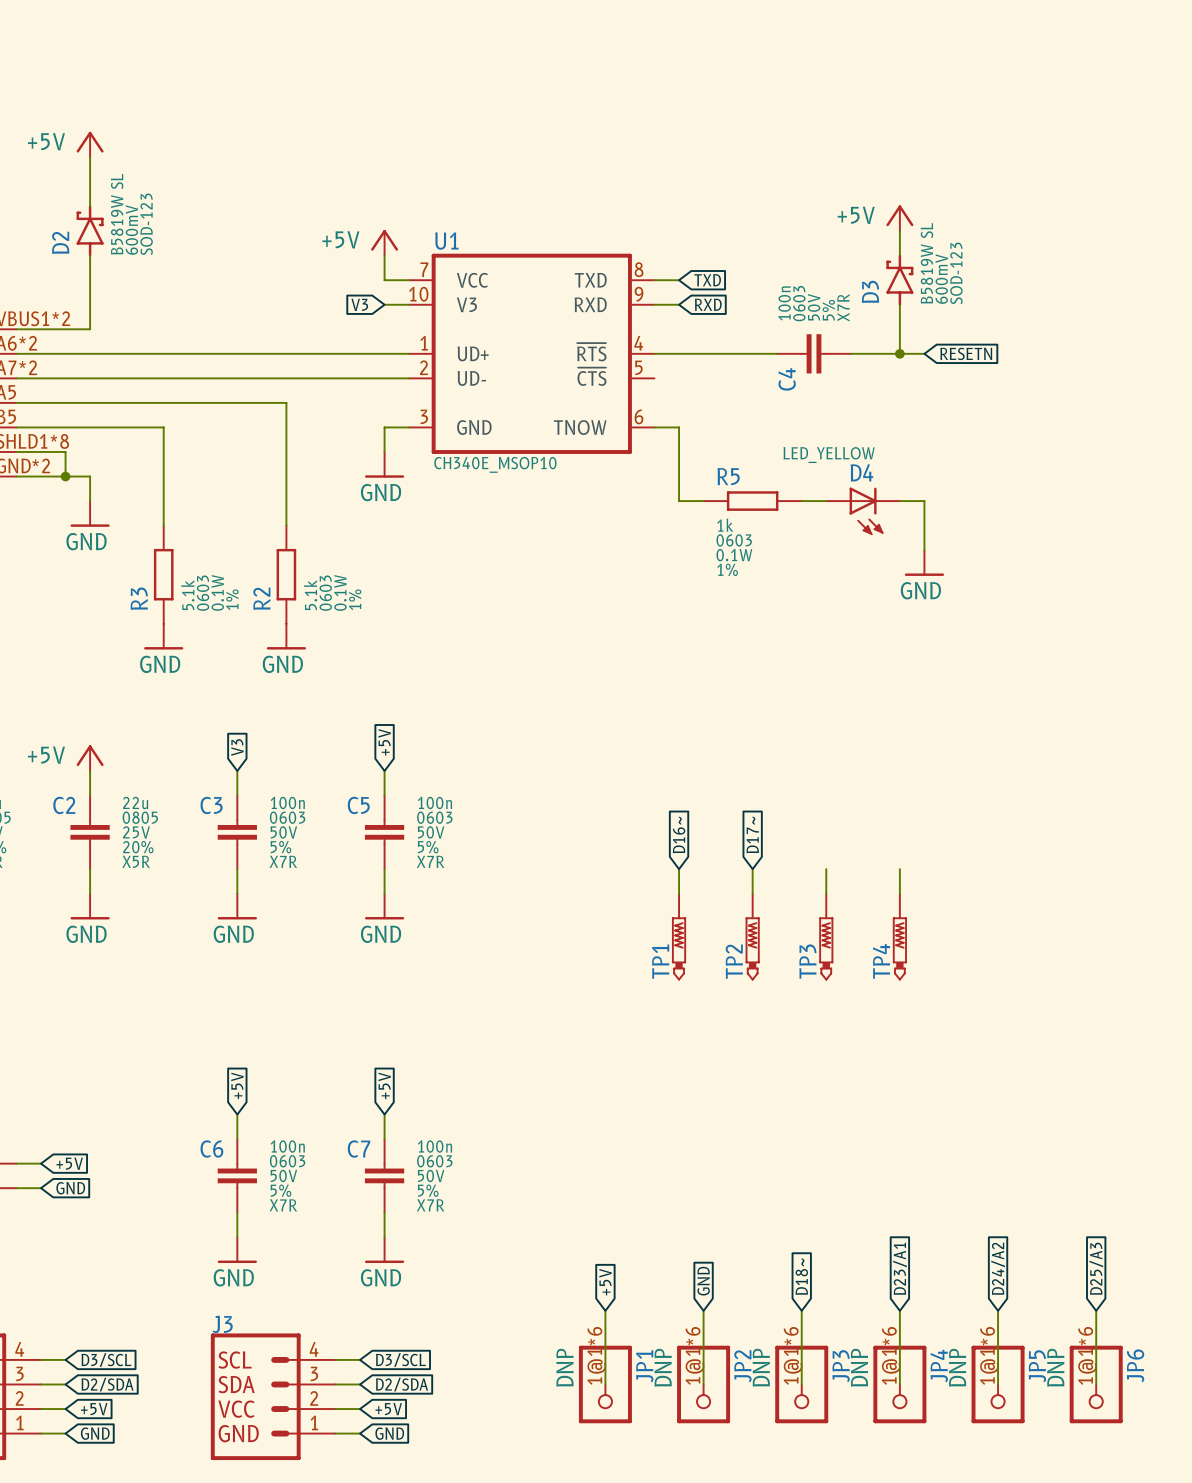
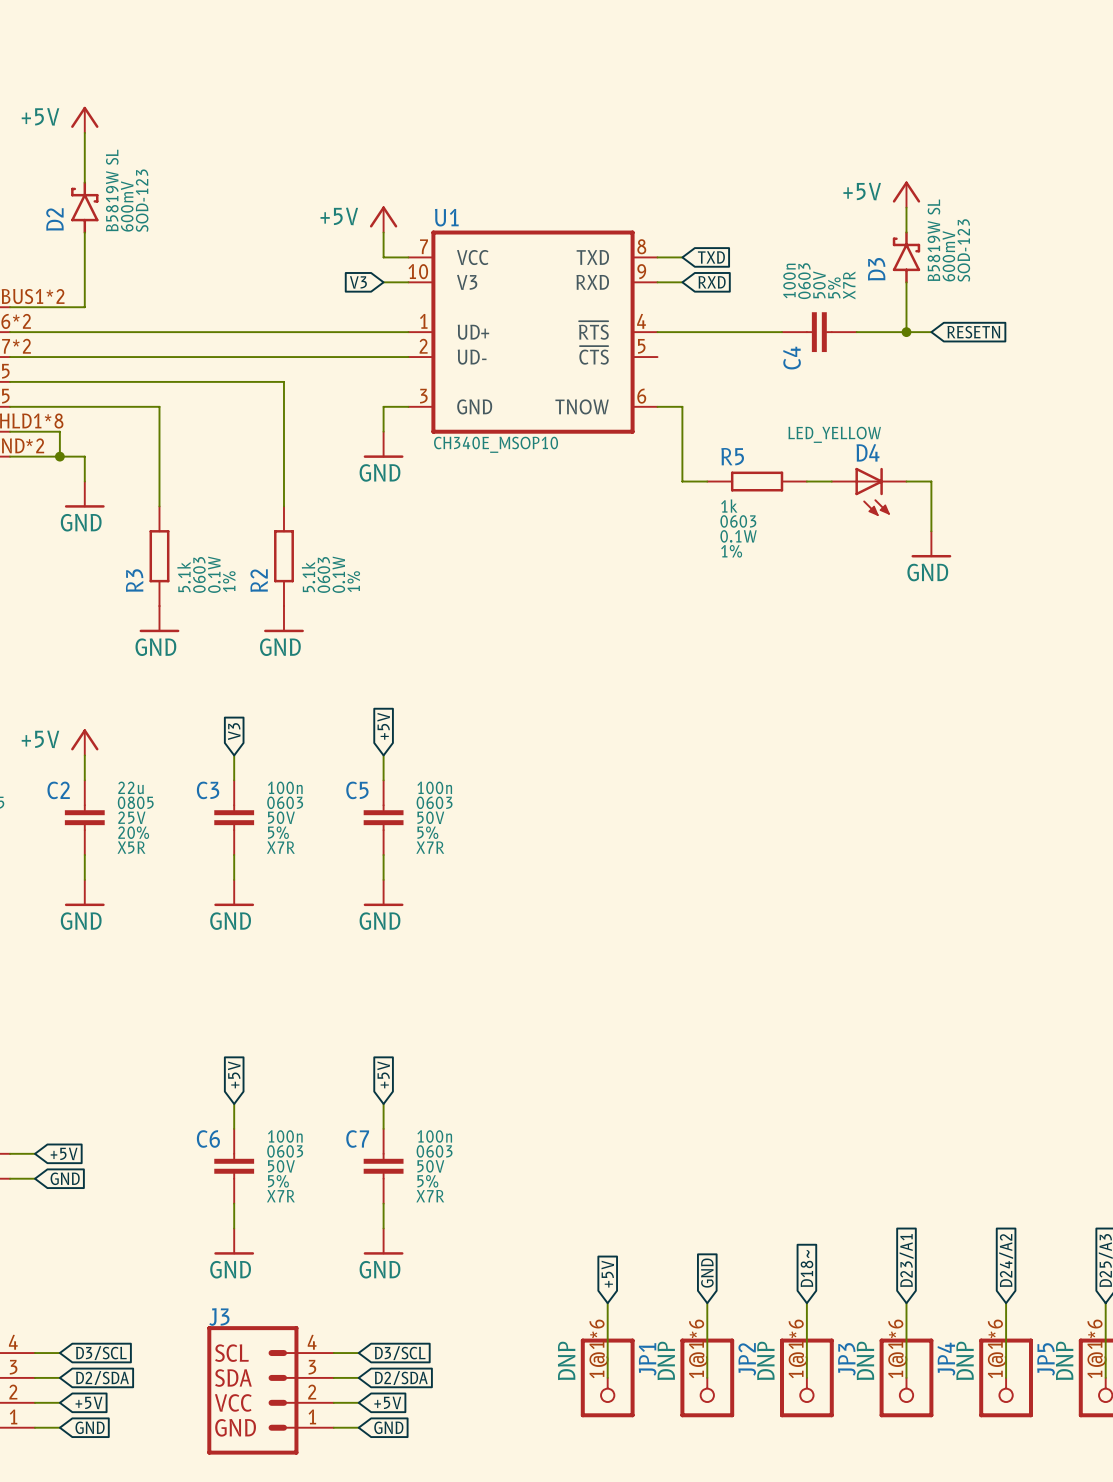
global label: D16~ (679, 834) -> none
global label: D17~ (752, 834) -> none
wire: (679, 869) (679, 893) -> none
wire: (752, 869) (752, 893) -> none
wire: (826, 869) (826, 893) -> none
wire: (899, 869) (899, 893) -> none
TP1: (679, 937) -> none
TP2: (752, 937) -> none
TP3: (826, 937) -> none
TP4: (899, 937) -> none

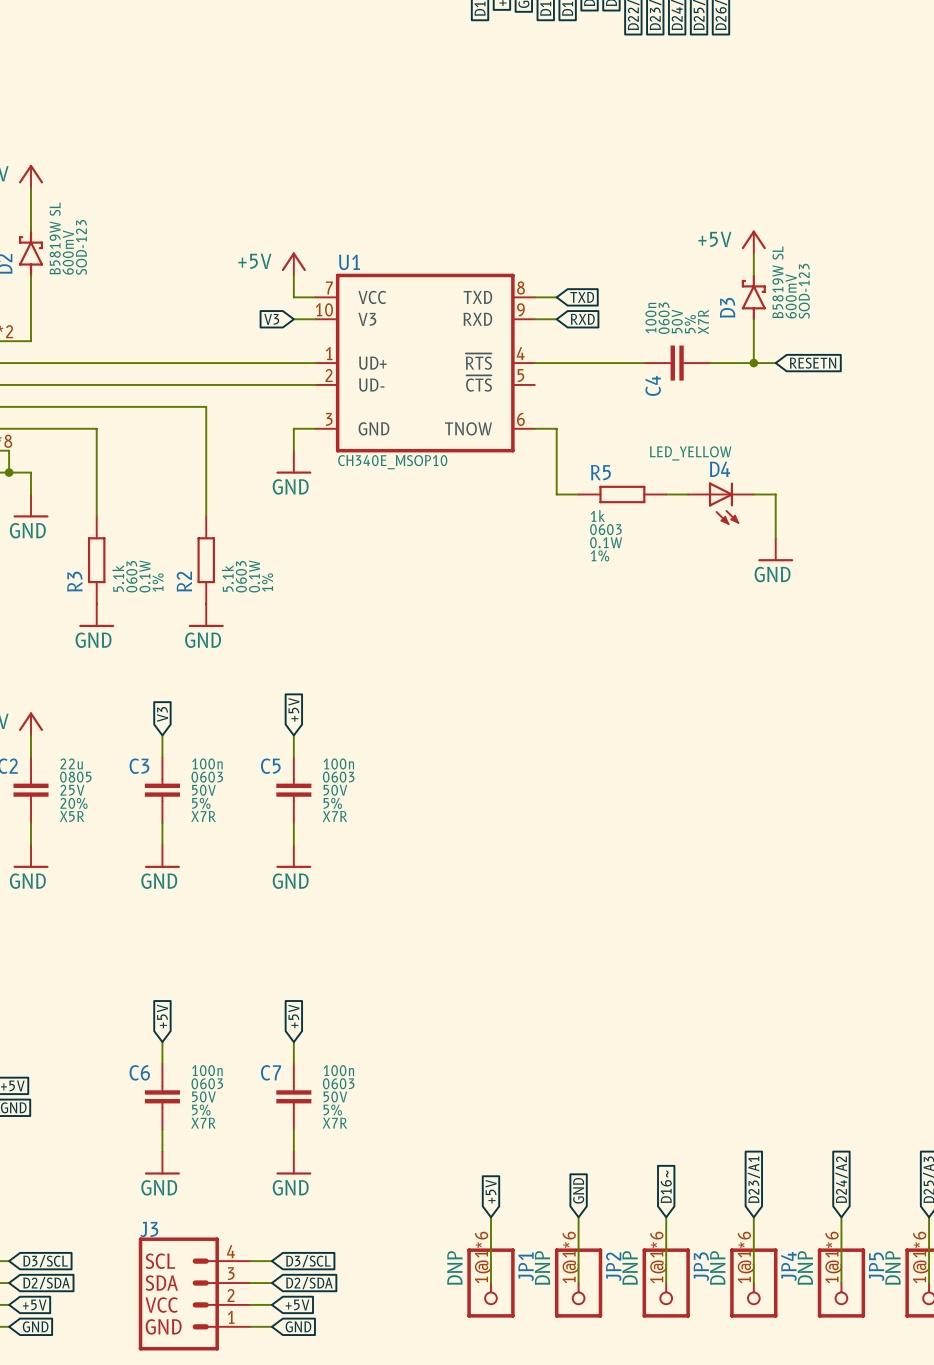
global label: D18~ (806, 1268) -> D16~ (666, 1186)

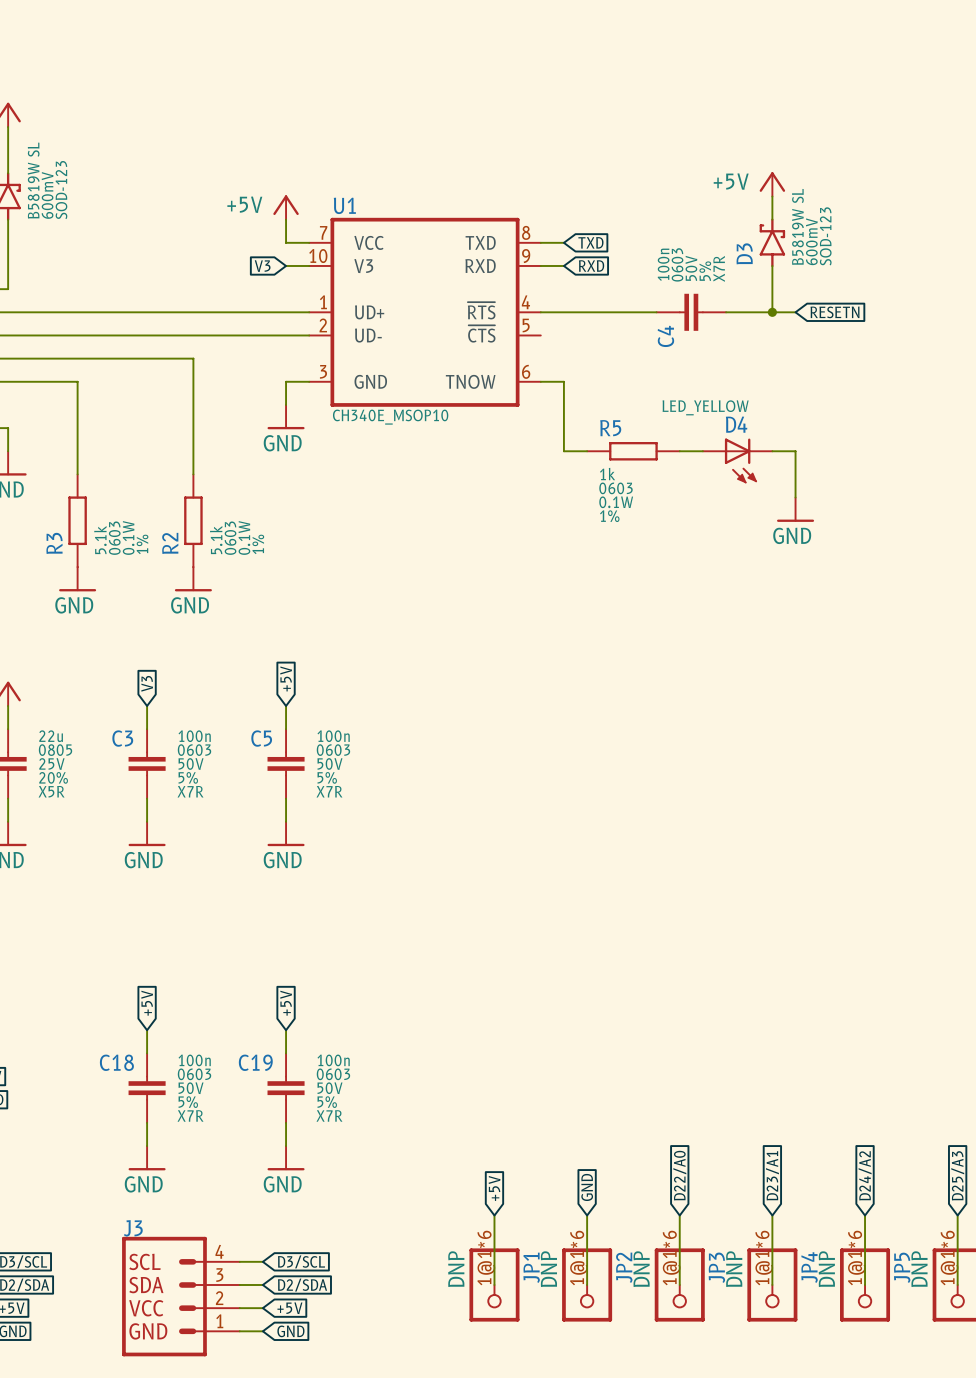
C6 name: C6 (139, 1072) -> C18 (116, 1062)
C7 name: C7 (271, 1072) -> C19 (255, 1062)
global label: D16~ (666, 1186) -> D22/A0 (679, 1175)

